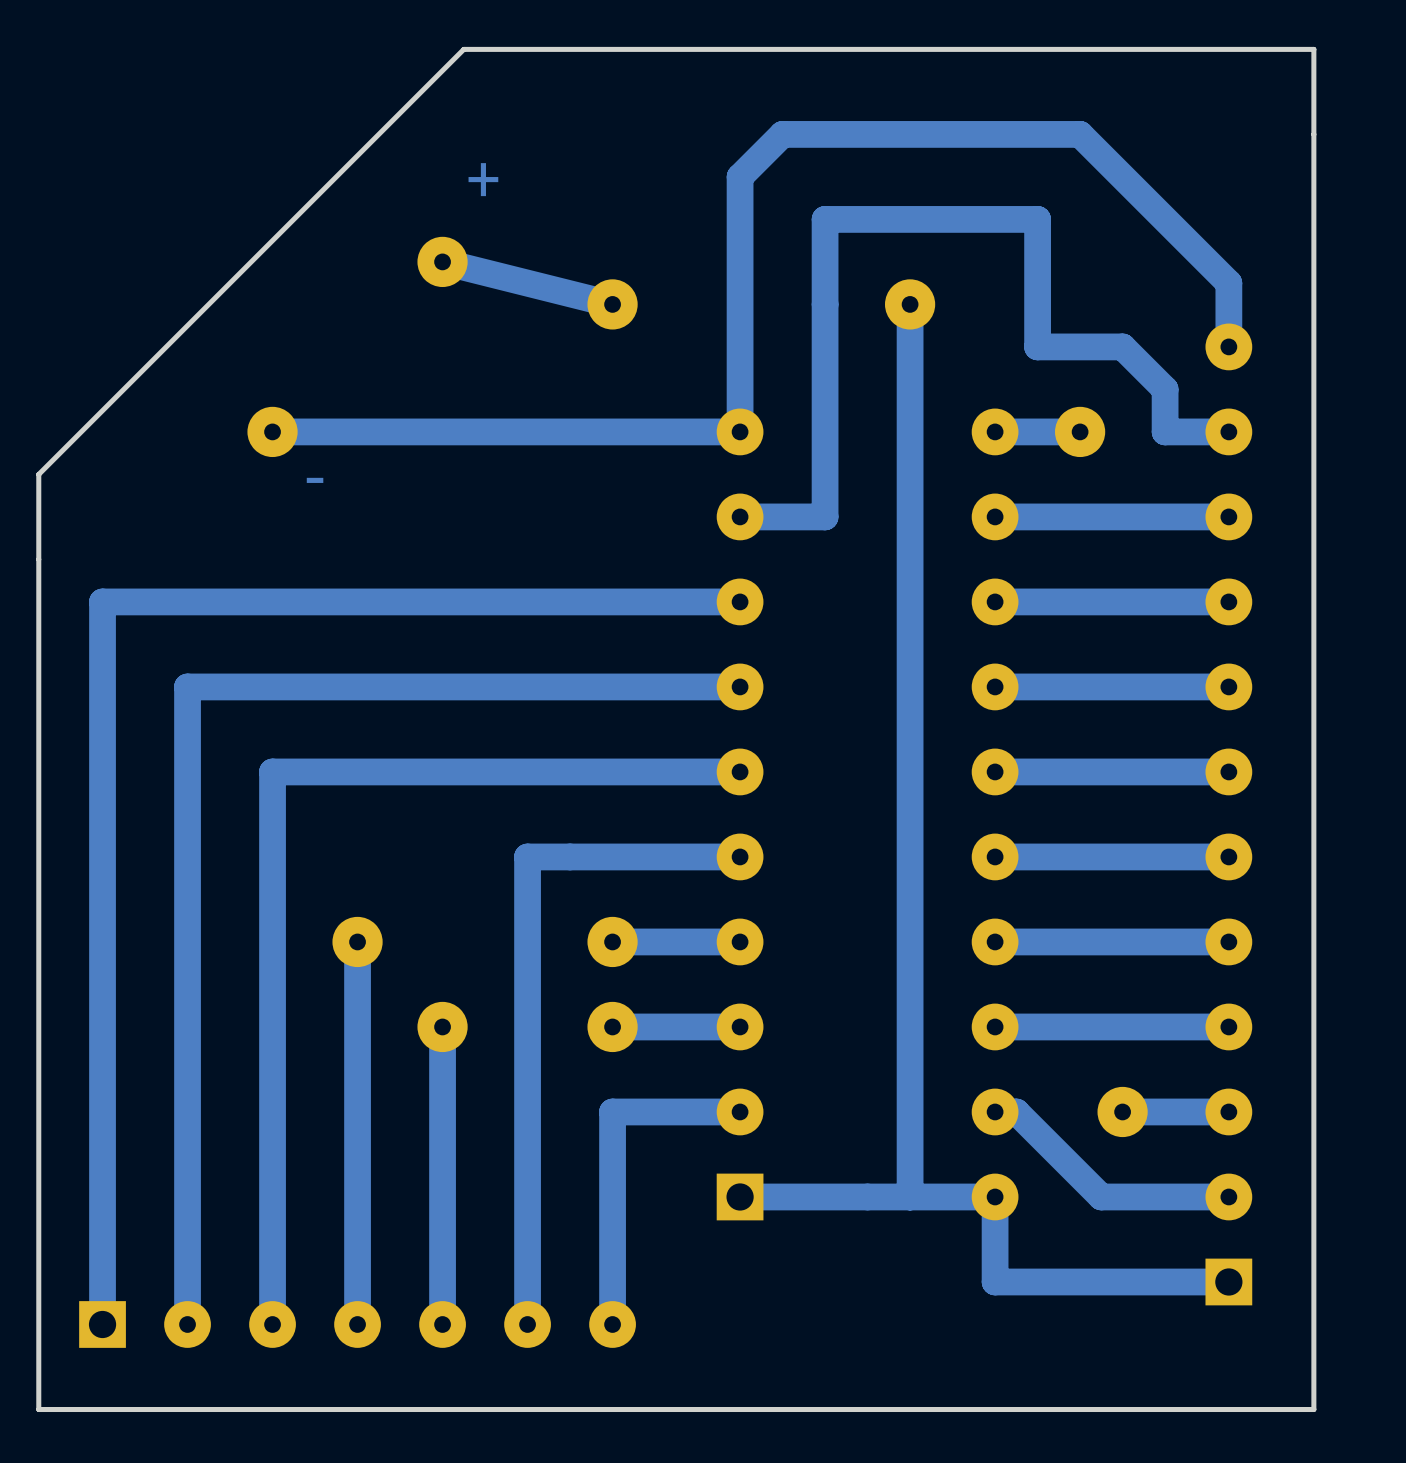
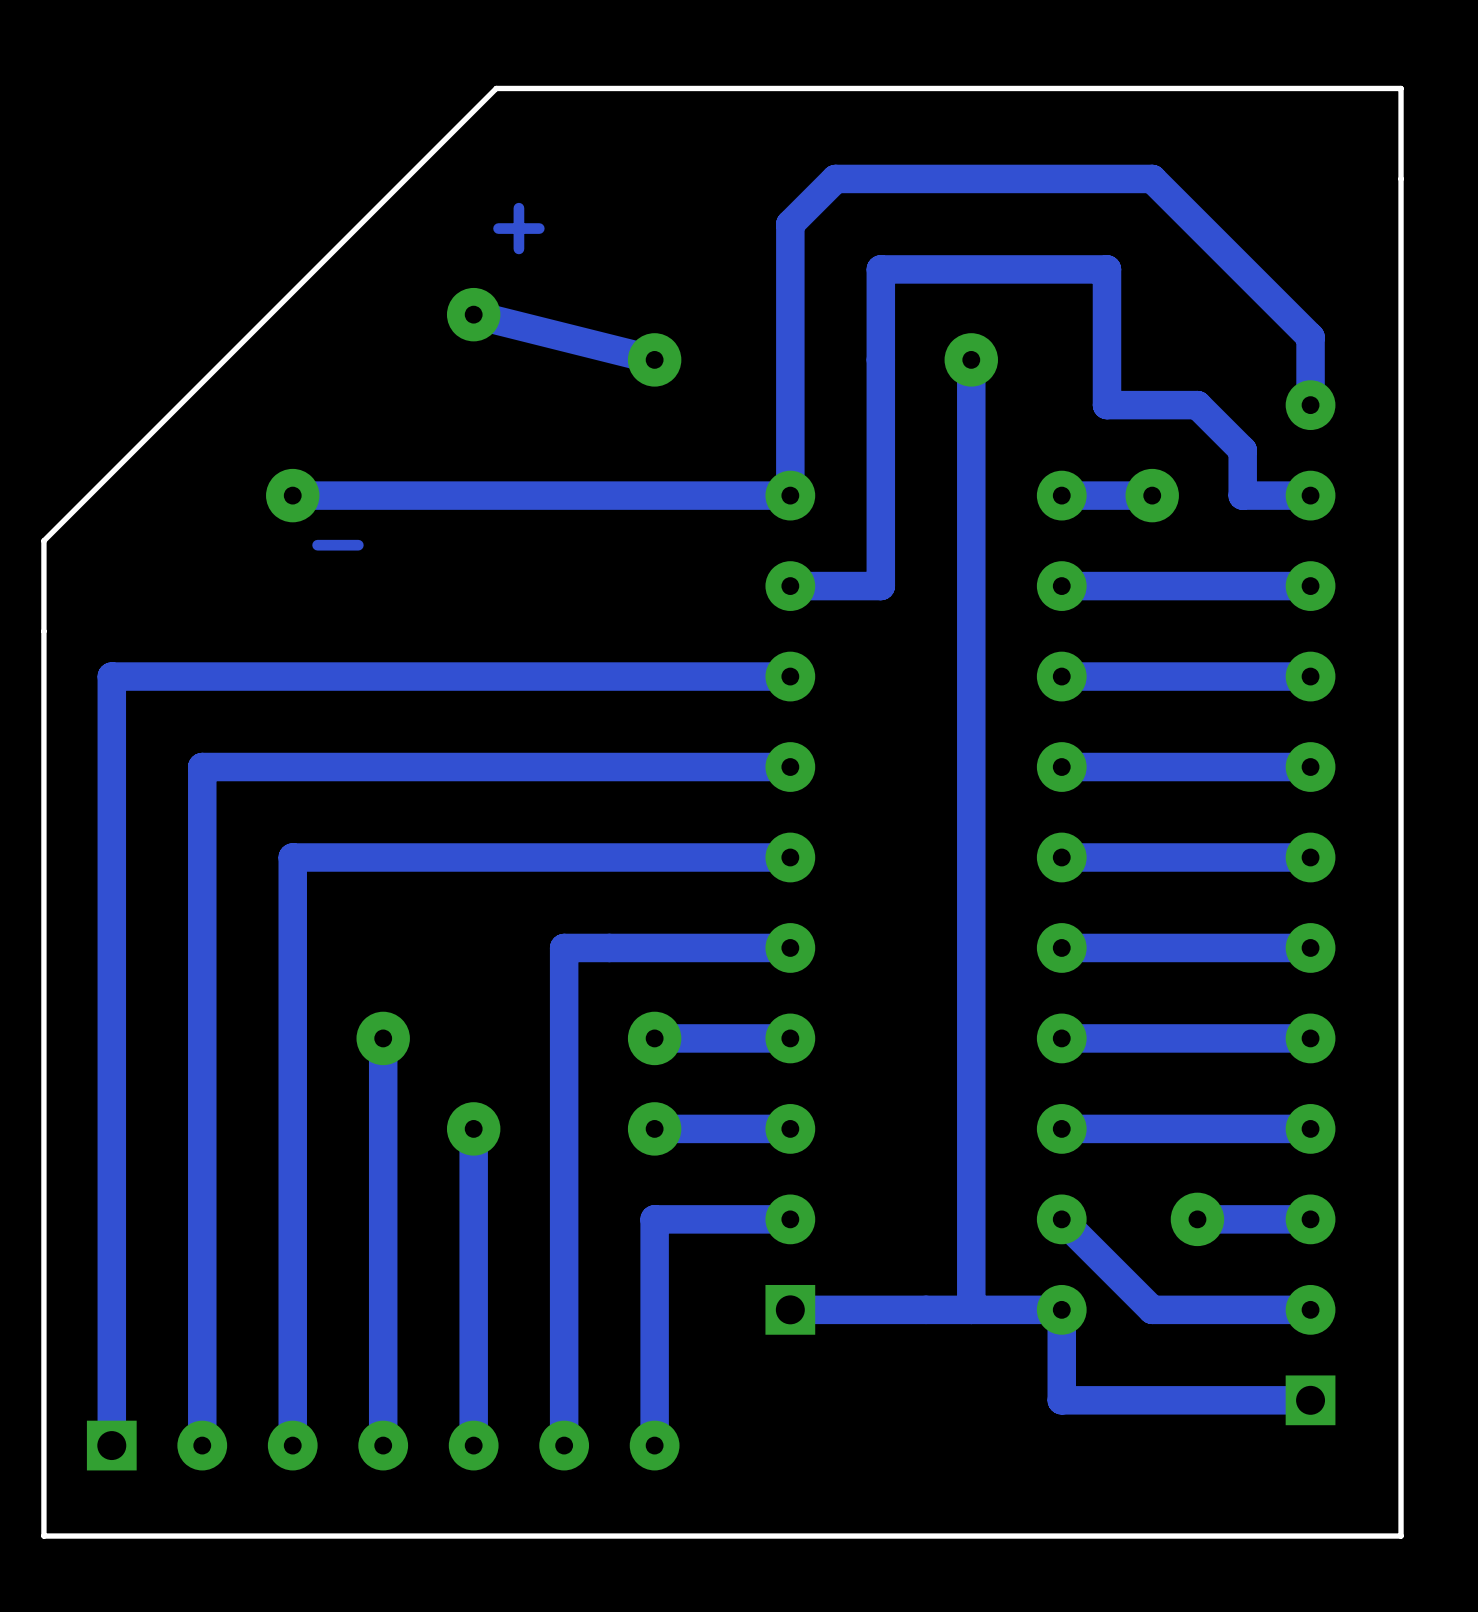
track: (995, 1111) (1016, 1111) (1101, 1196) -> (1061, 1219) (1152, 1309) (1174, 1309)

